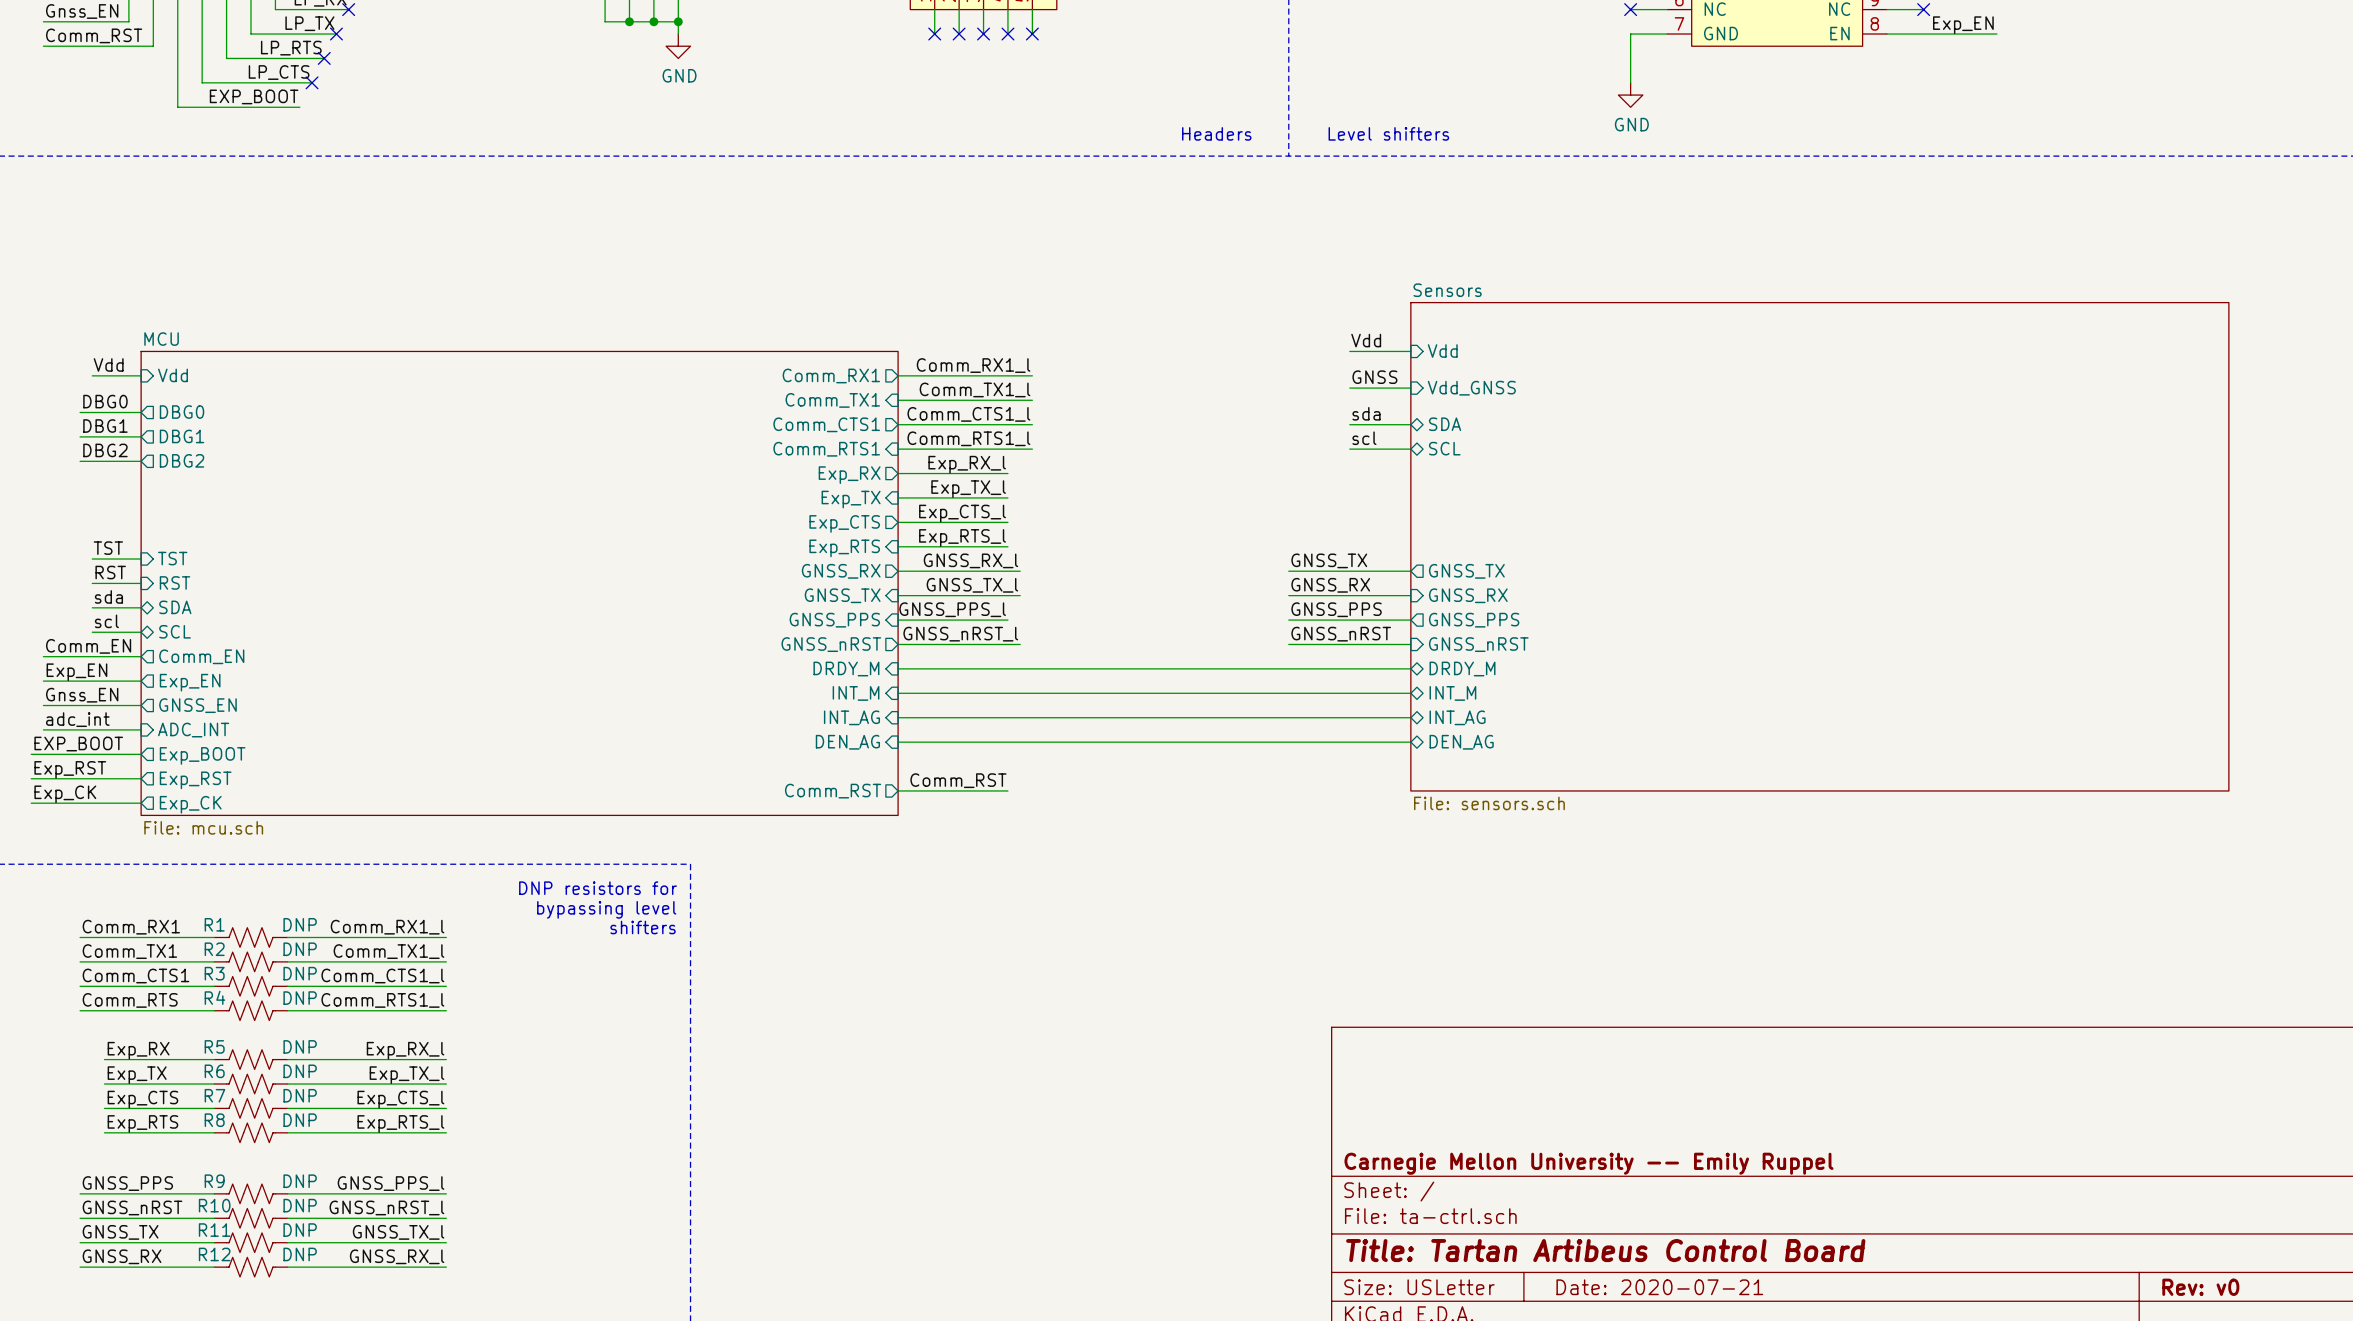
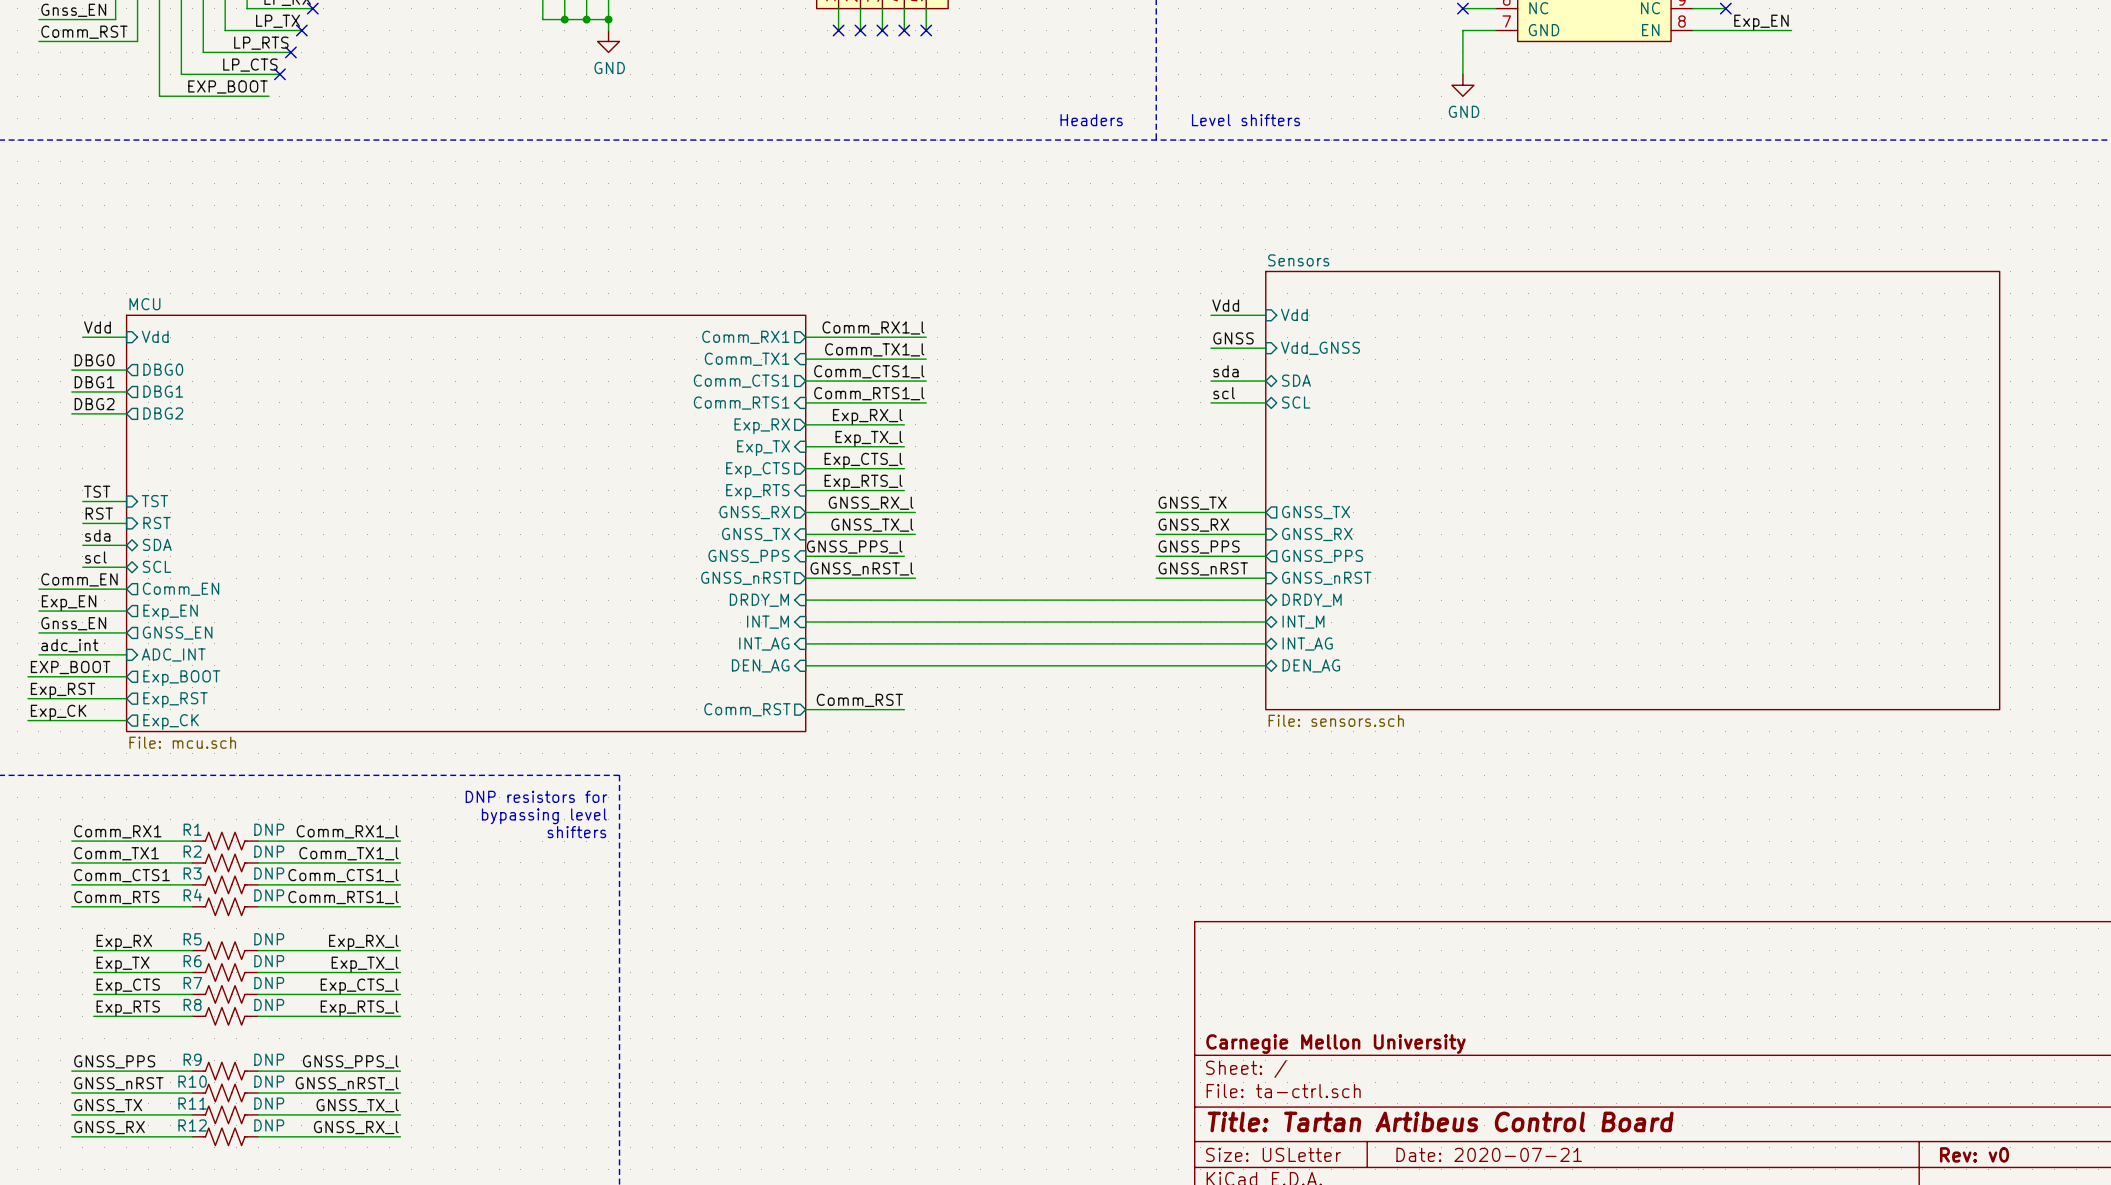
title block: Carnegie Mellon University -- Emily Ruppel (1588, 1163) -> Carnegie Mellon University (1335, 1044)

